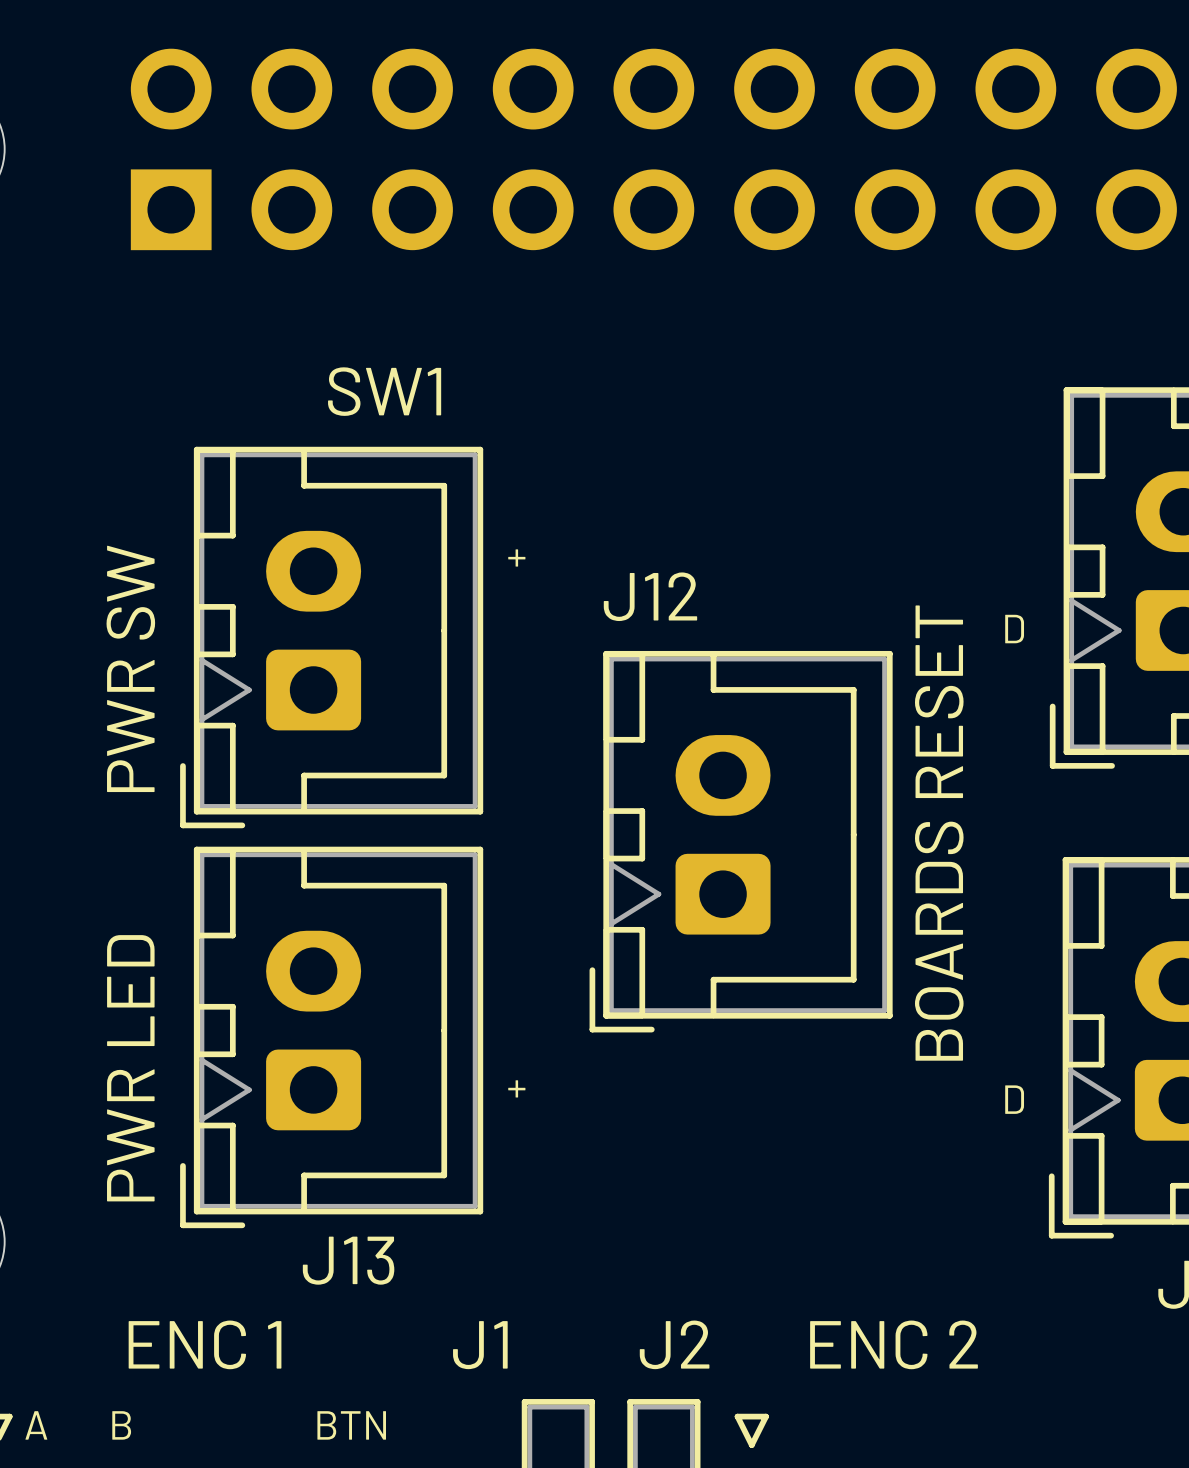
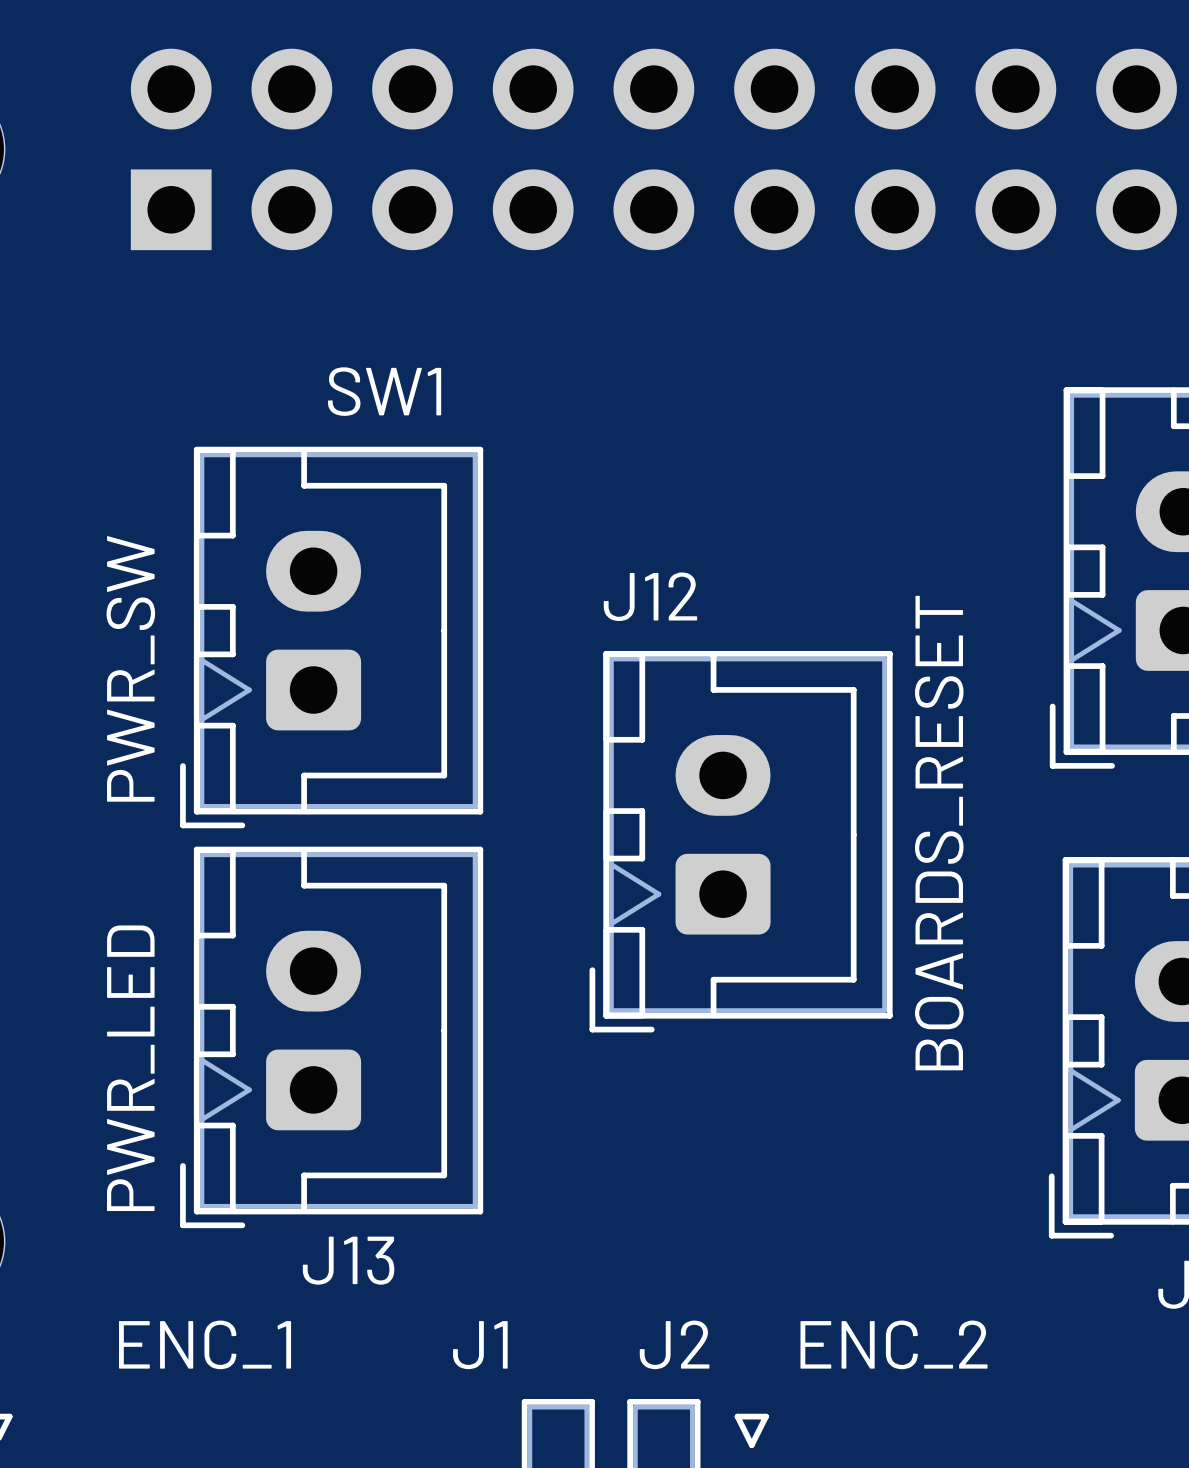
text: + (516, 557) -> none
text: D (1014, 629) -> none
SW1 value: PWR SW (130, 668) -> PWR_SW (130, 668)
J12 value: BOARDS RESET (939, 833) -> BOARDS_RESET (939, 833)
J13 value: PWR LED (130, 1068) -> PWR_LED (130, 1068)
text: + (516, 1088) -> none
text: D (1014, 1099) -> none
J1 value: ENC 1 (205, 1344) -> ENC_1 (205, 1344)
J2 value: ENC 2 (894, 1344) -> ENC_2 (894, 1344)
text: A (36, 1425) -> none
text: B (121, 1425) -> none
text: BTN (351, 1425) -> none

